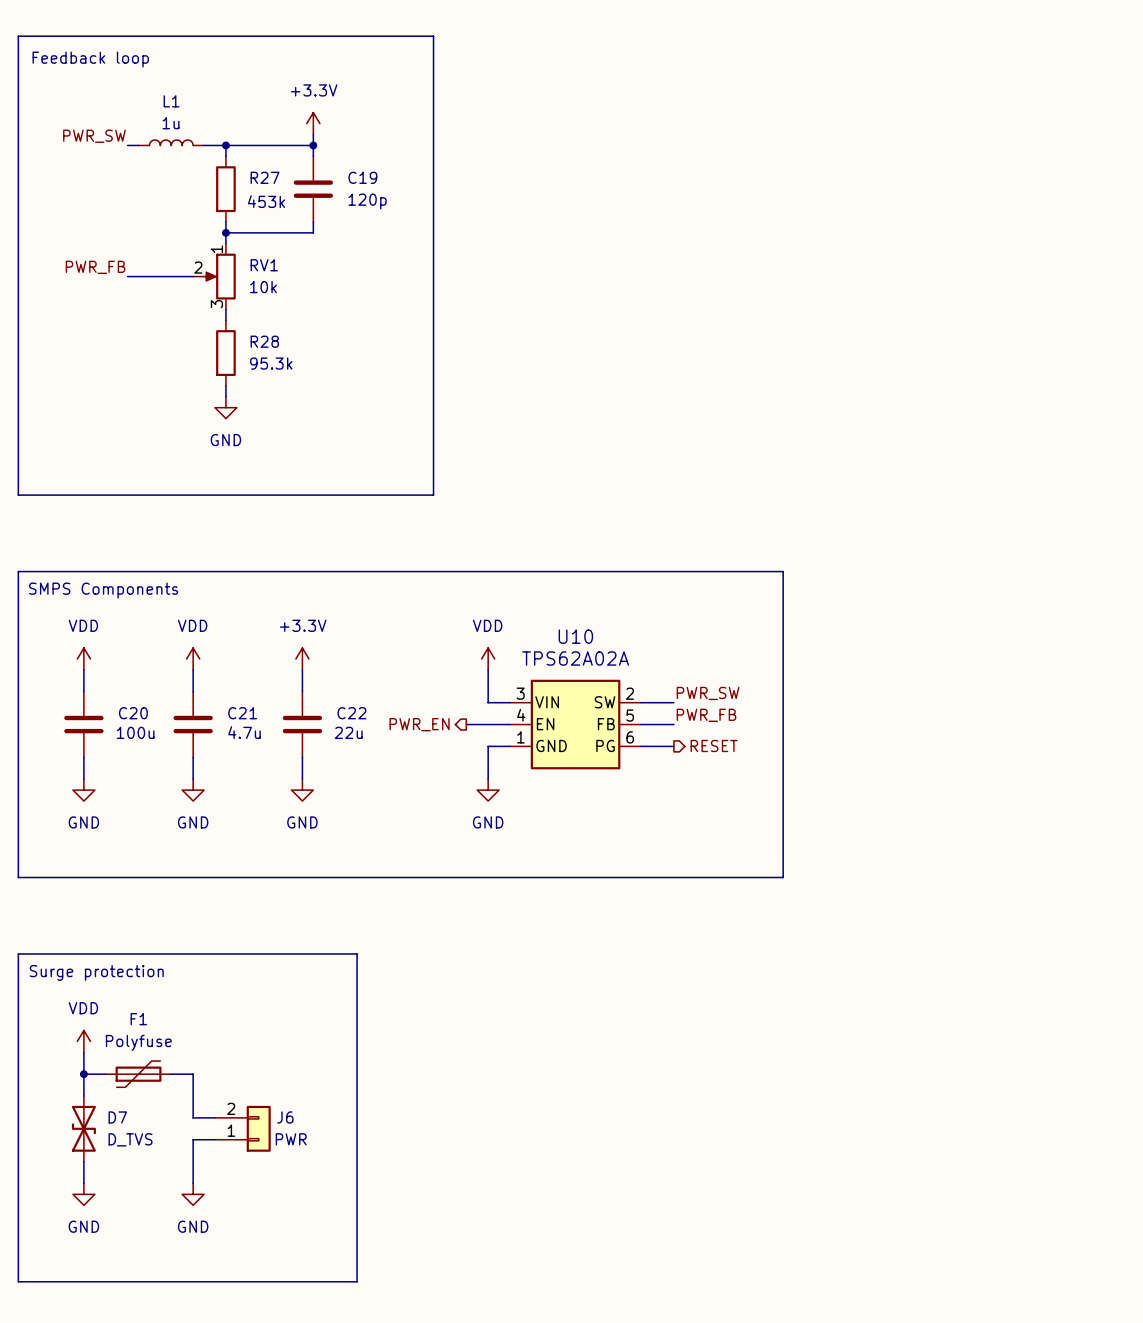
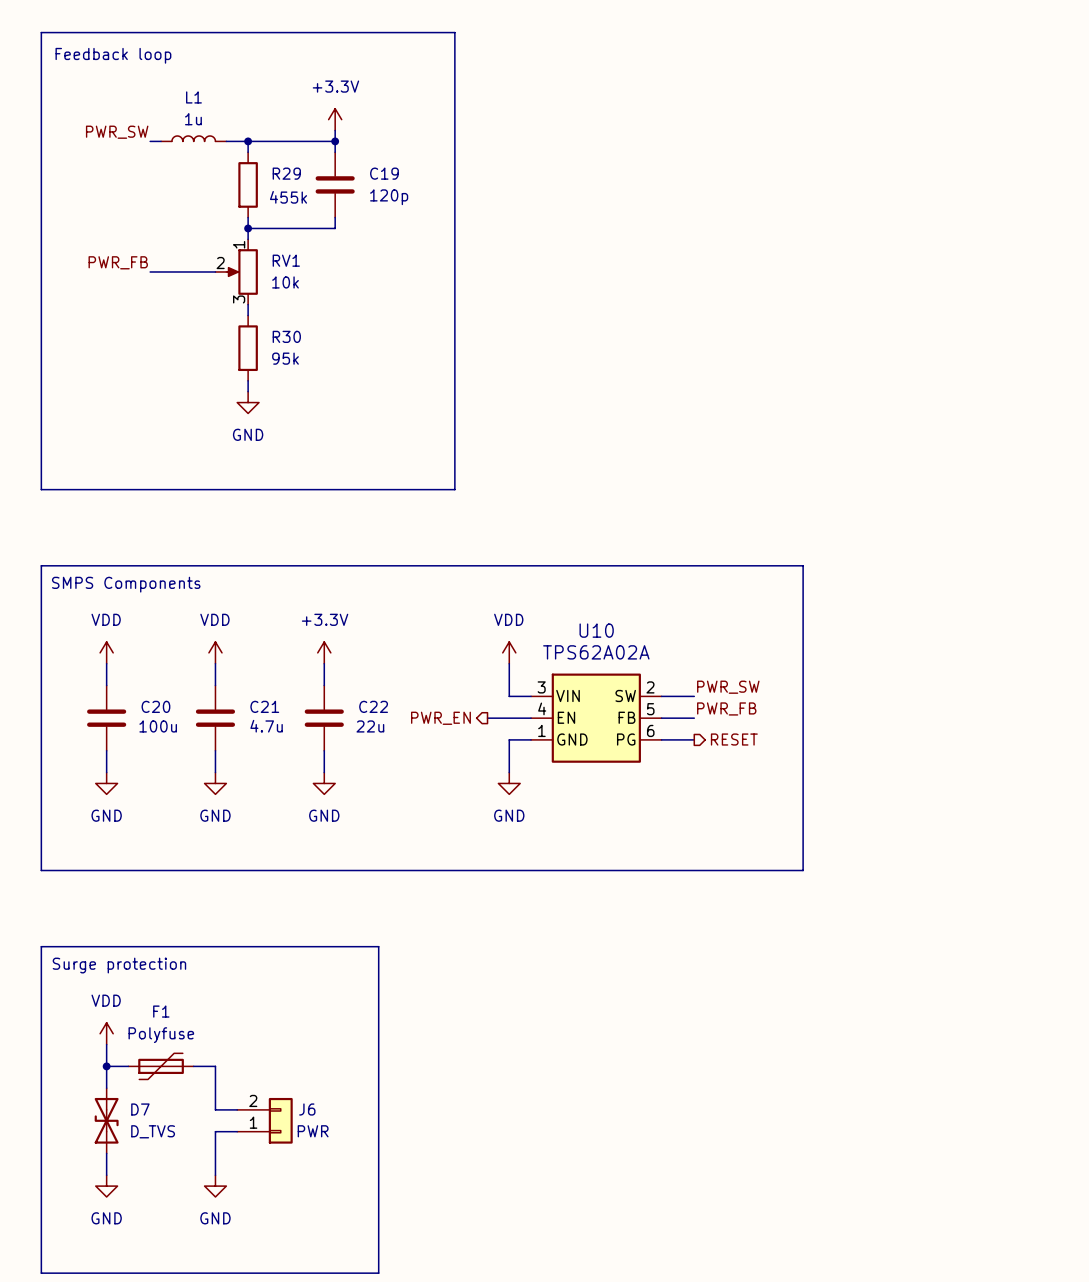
R27 name: R27 (265, 177) -> R29 (286, 173)
R27 value: 453k (266, 201) -> 455k (288, 197)
R28 name: R28 (264, 341) -> R30 (286, 336)
R28 value: 95.3k (271, 363) -> 95k (285, 358)

